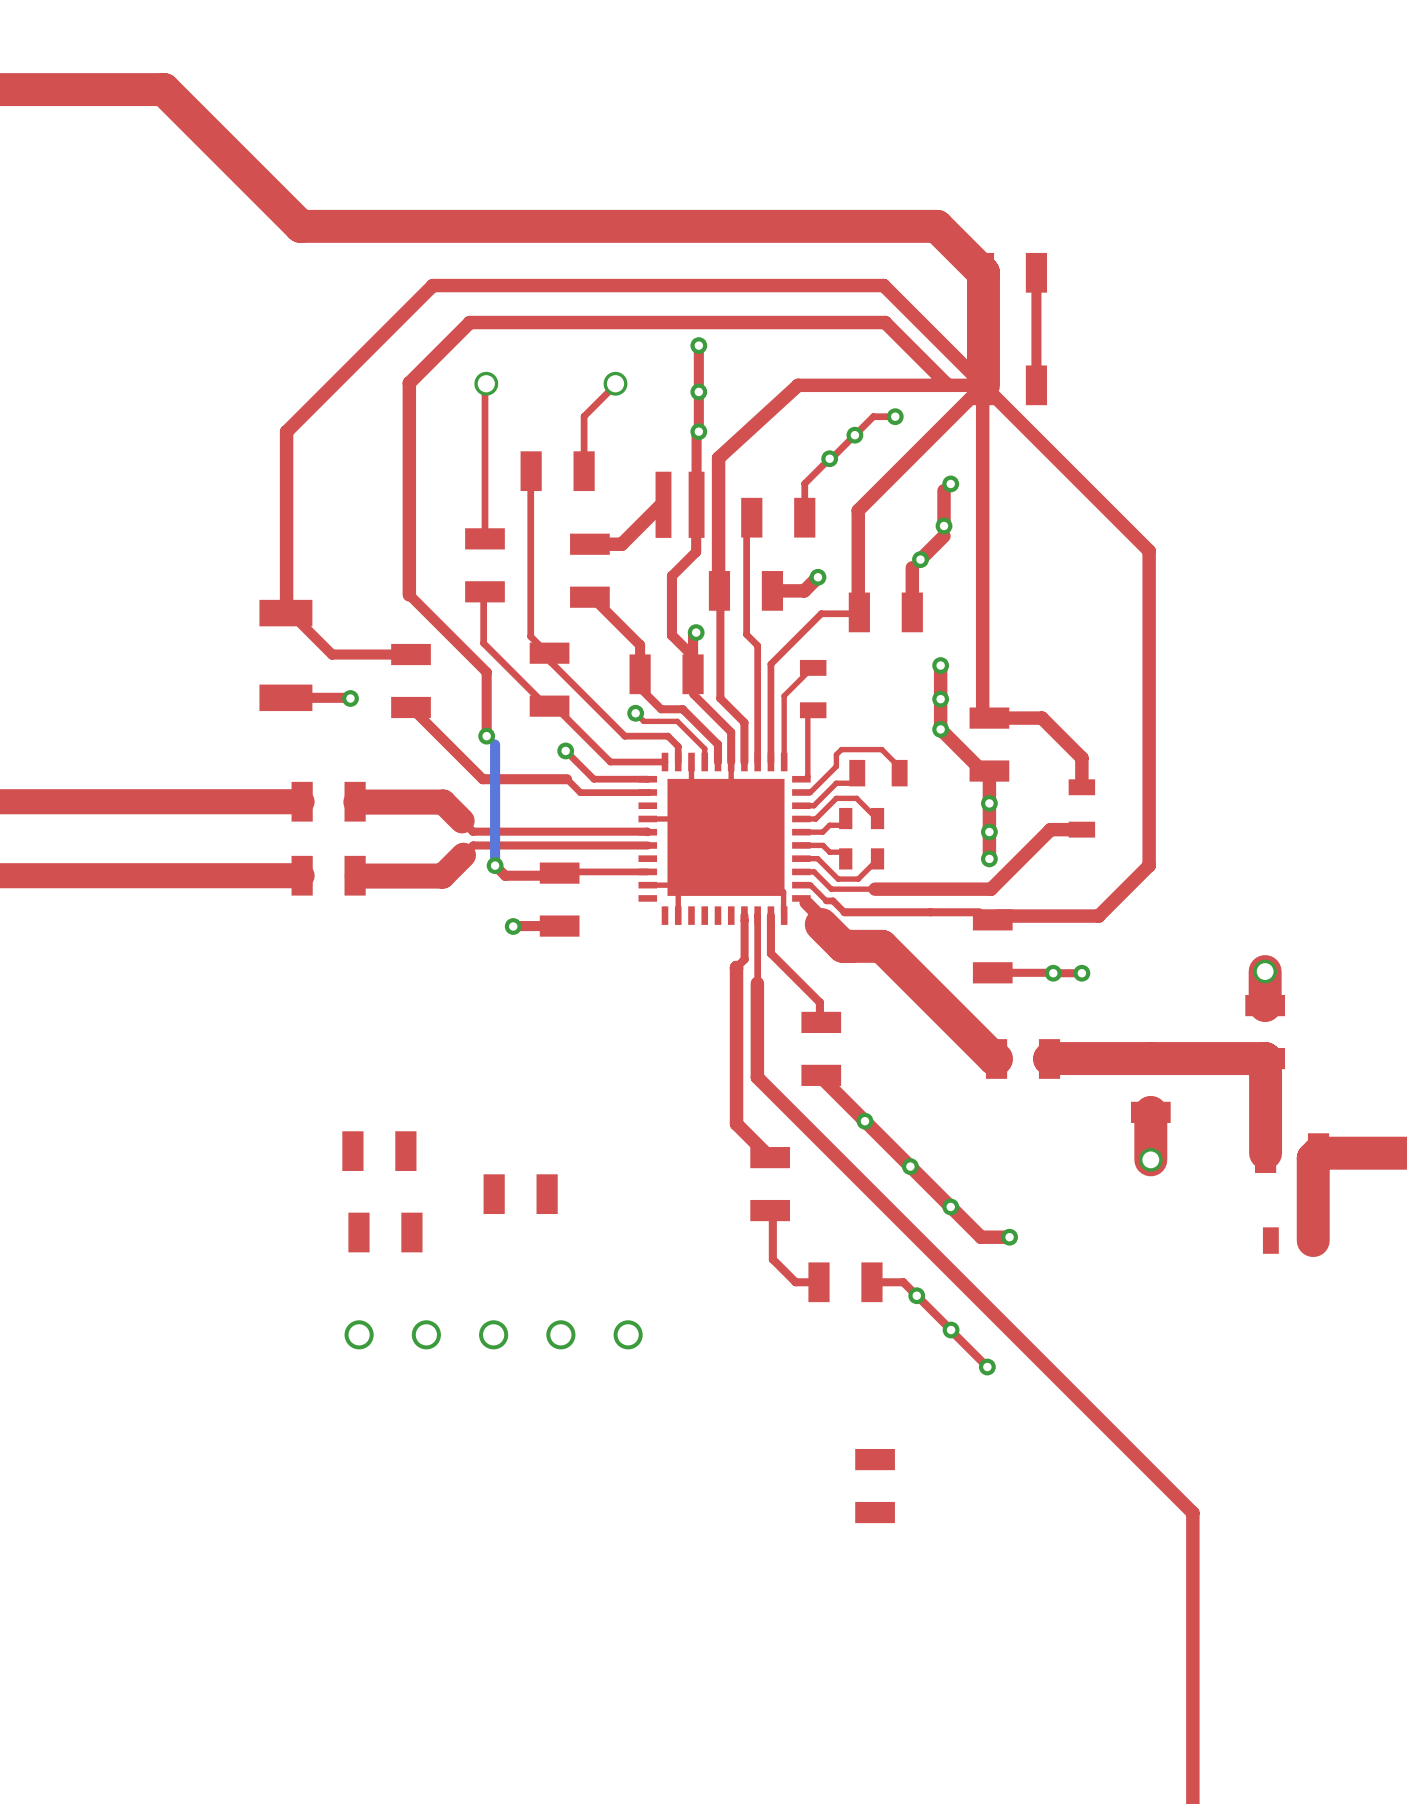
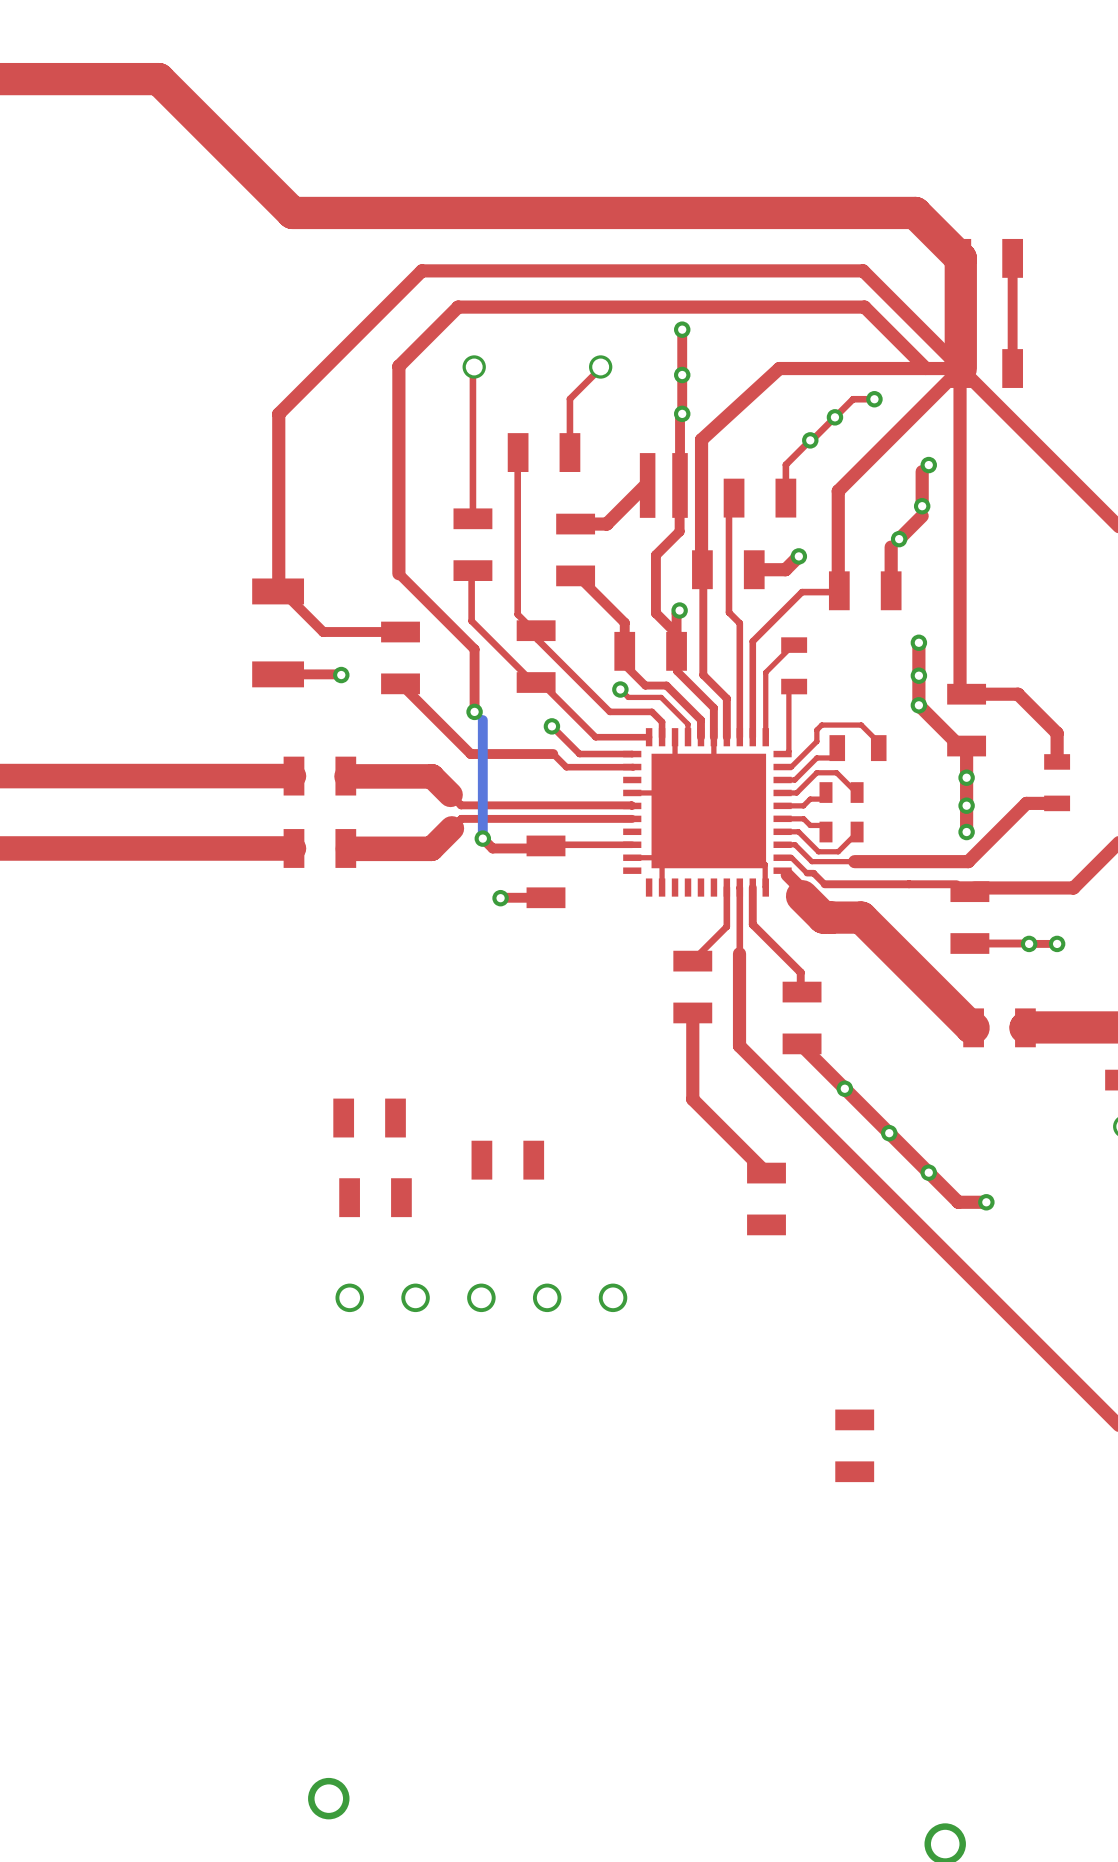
top track: (744, 915) (744, 959) (736, 967) (736, 1123) (770, 1157) -> (726, 887) (726, 926) (692, 961)
part: none -> (692, 987)
top track: none -> (692, 1012) (692, 1099) (766, 1173)
part: (770, 1184) -> none
top track: (770, 1210) (772, 1215) (772, 1259) (795, 1282) (819, 1282) -> none
part: none -> (766, 1198)
part: (845, 1282) -> none
top track: (871, 1282) (903, 1282) (951, 1330) -> none
via: (916, 1295) -> none
top track: (949, 1328) (987, 1367) -> none
via: (951, 1330) -> none
via: (987, 1367) -> none

